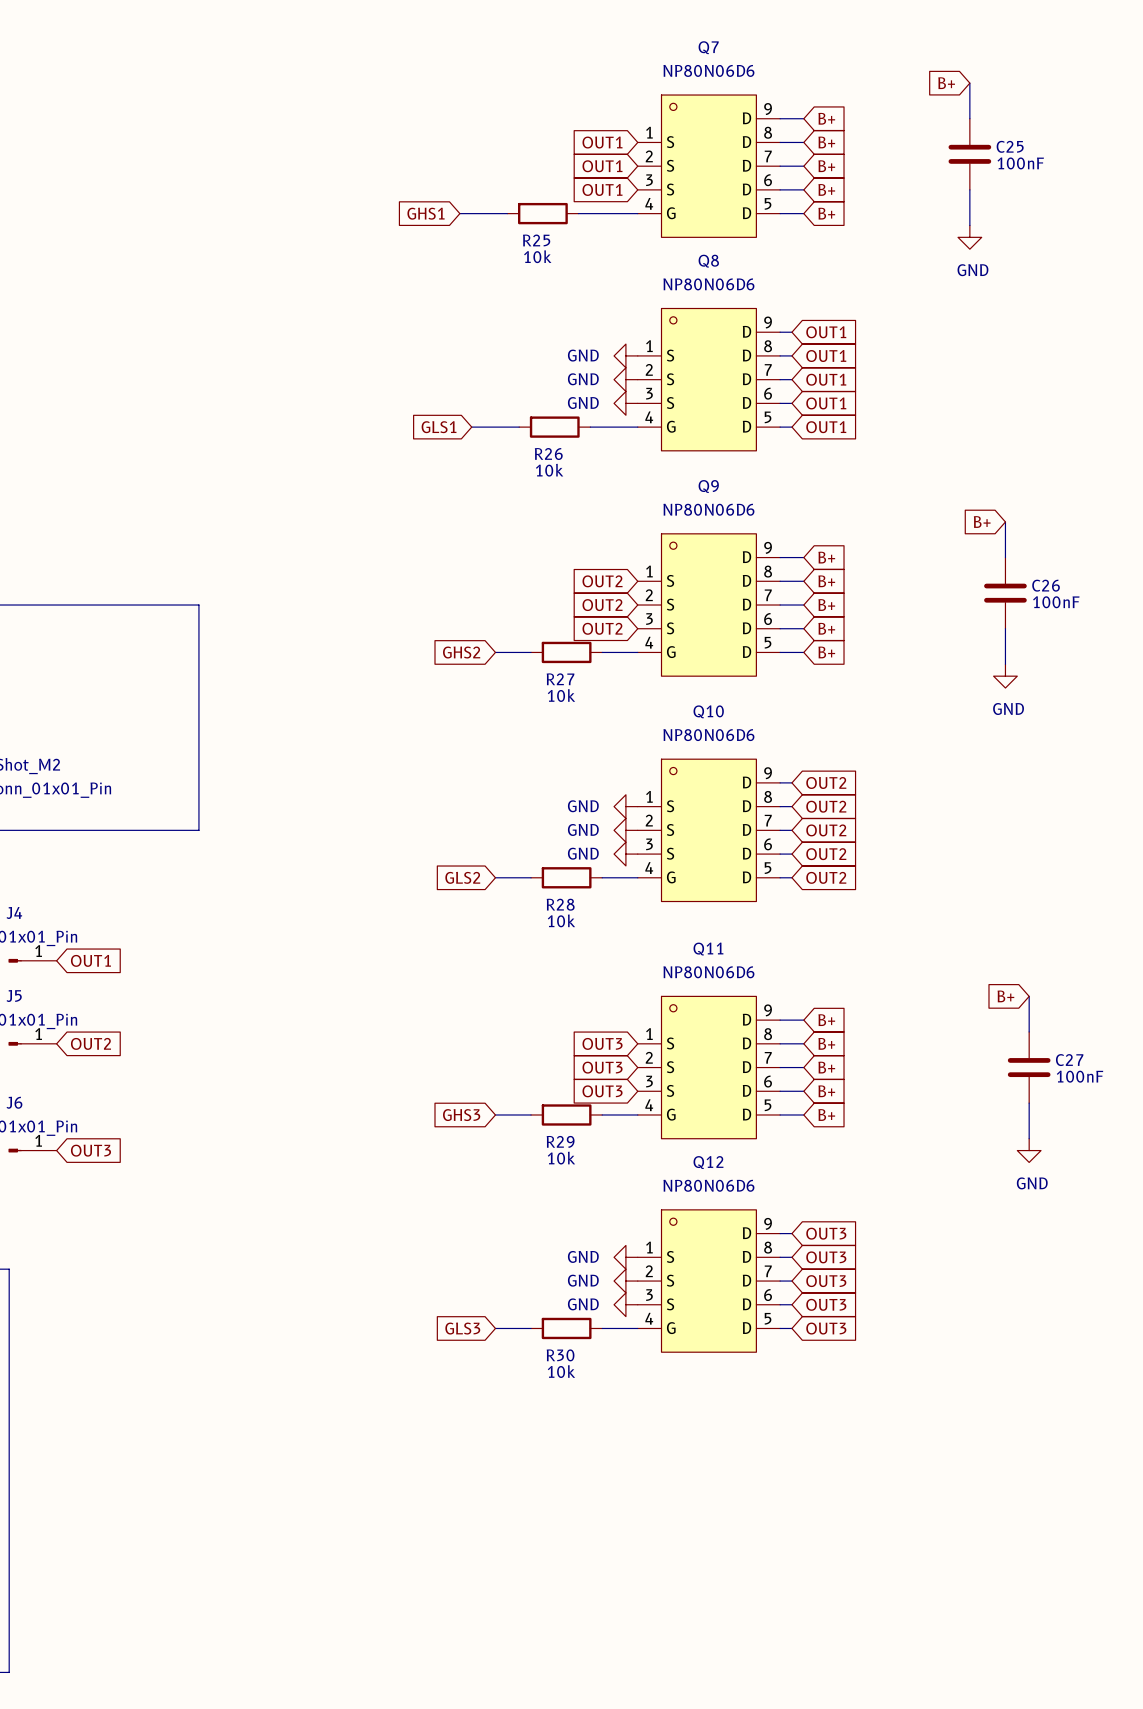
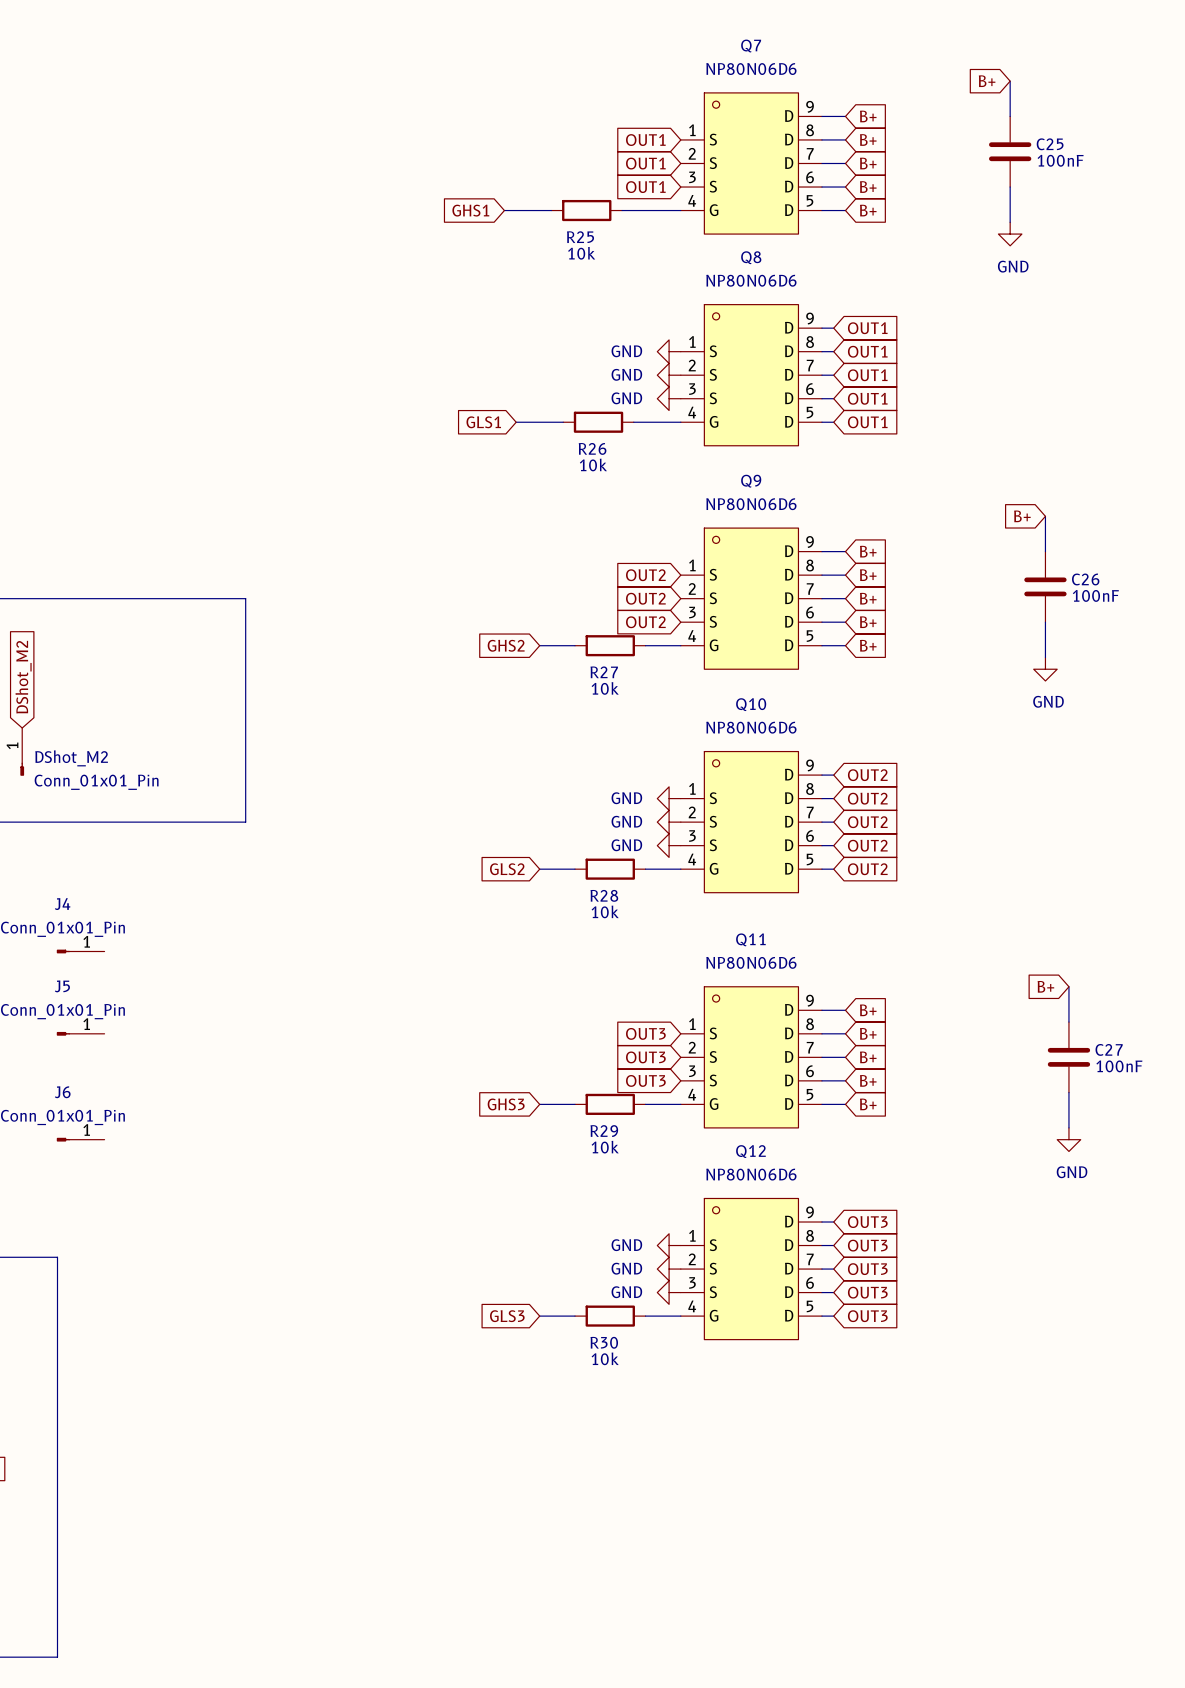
global label: OUT1 (90, 960) -> none
global label: OUT2 (90, 1043) -> none
global label: OUT3 (90, 1150) -> none

